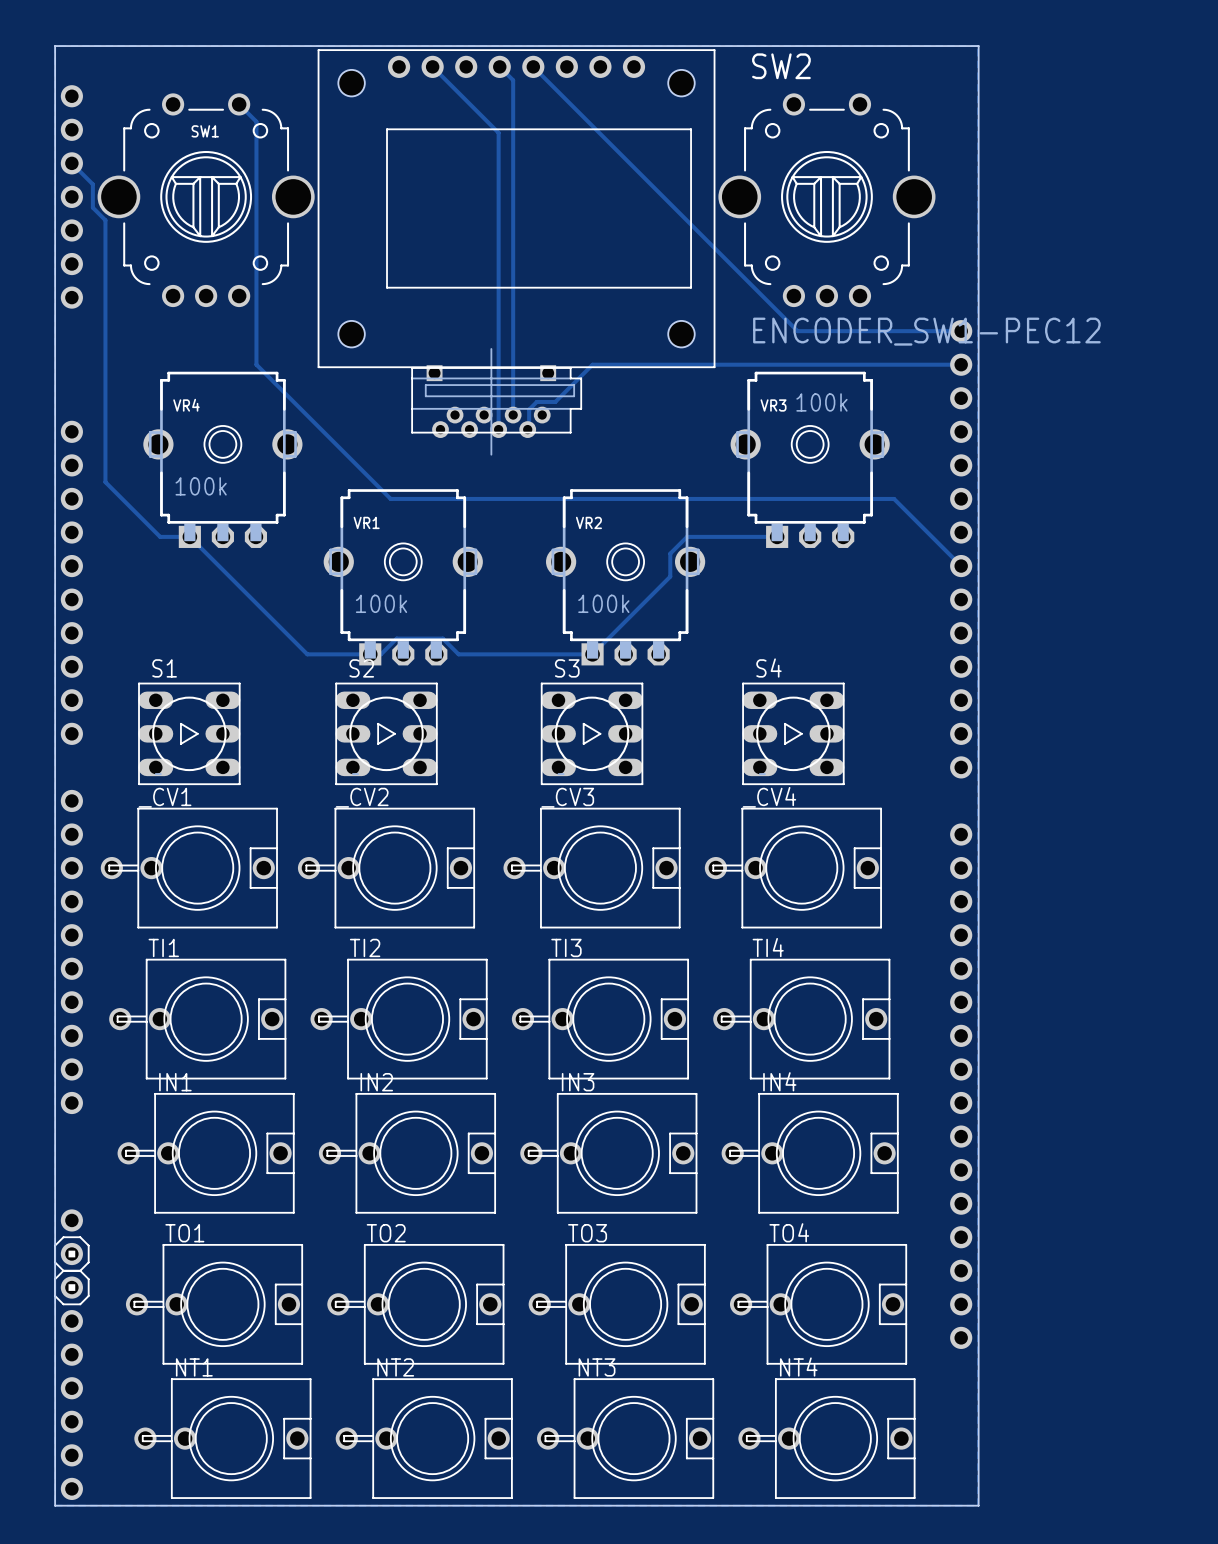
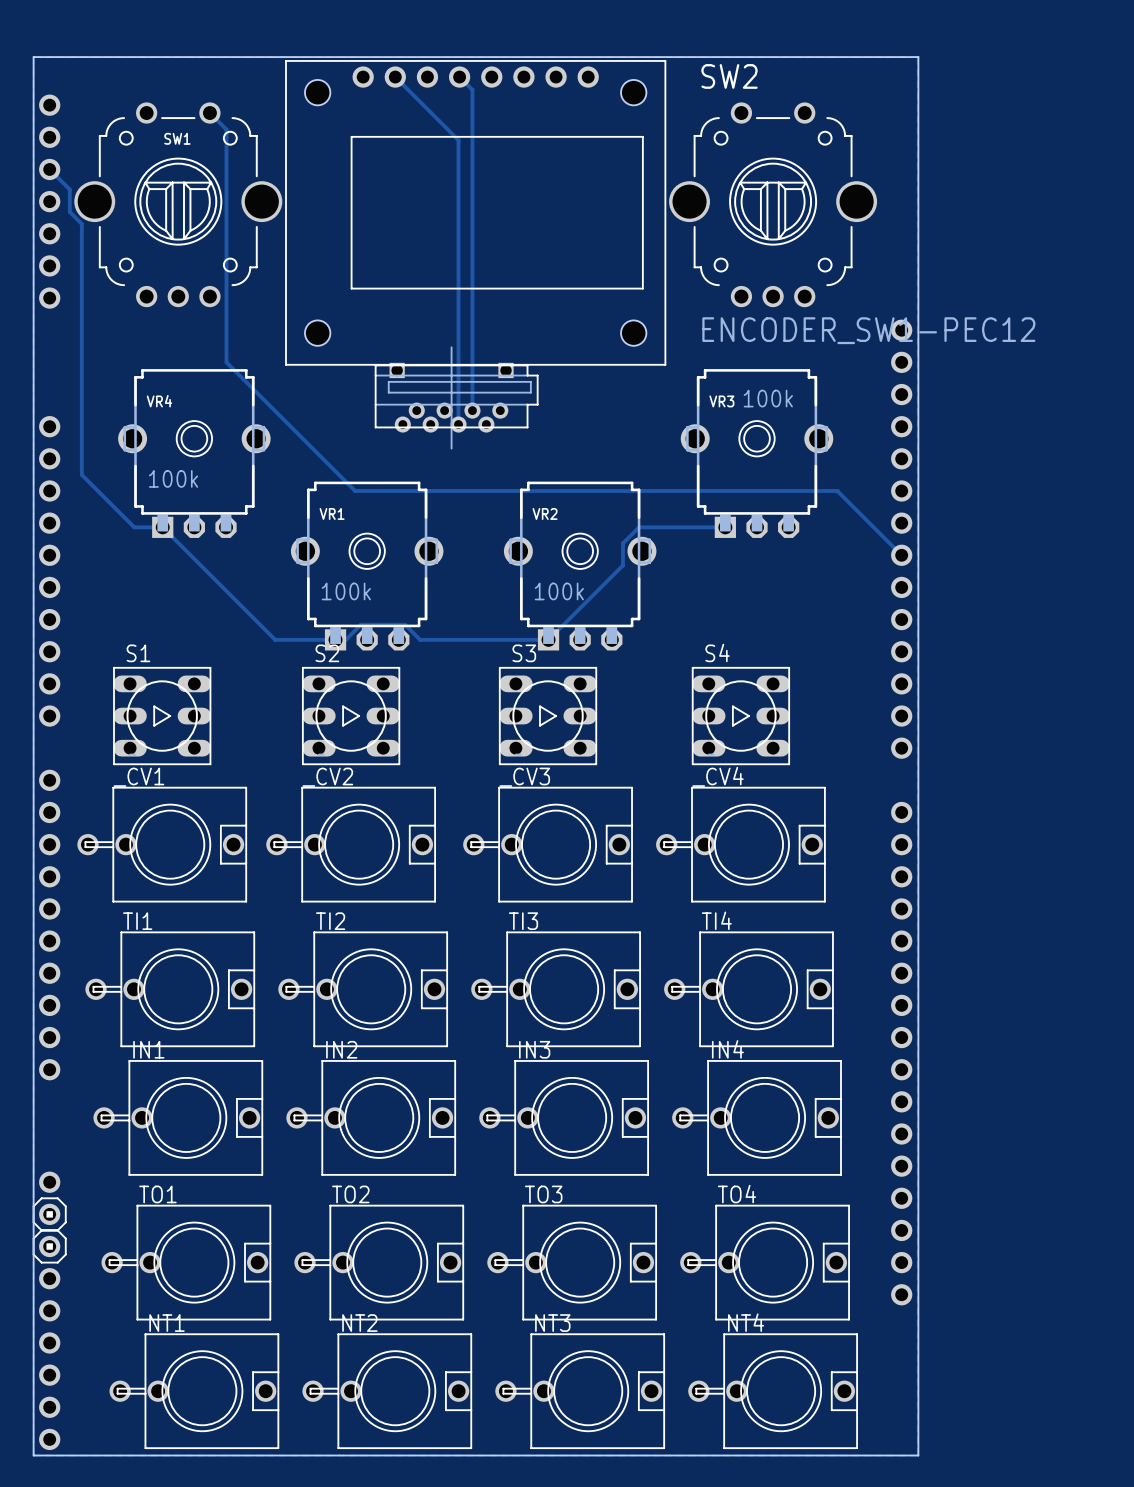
track: (533, 66) (797, 331) (961, 331) -> none
track: (961, 364) (592, 364) (555, 401) (536, 401) (529, 409) (527, 429) -> none

